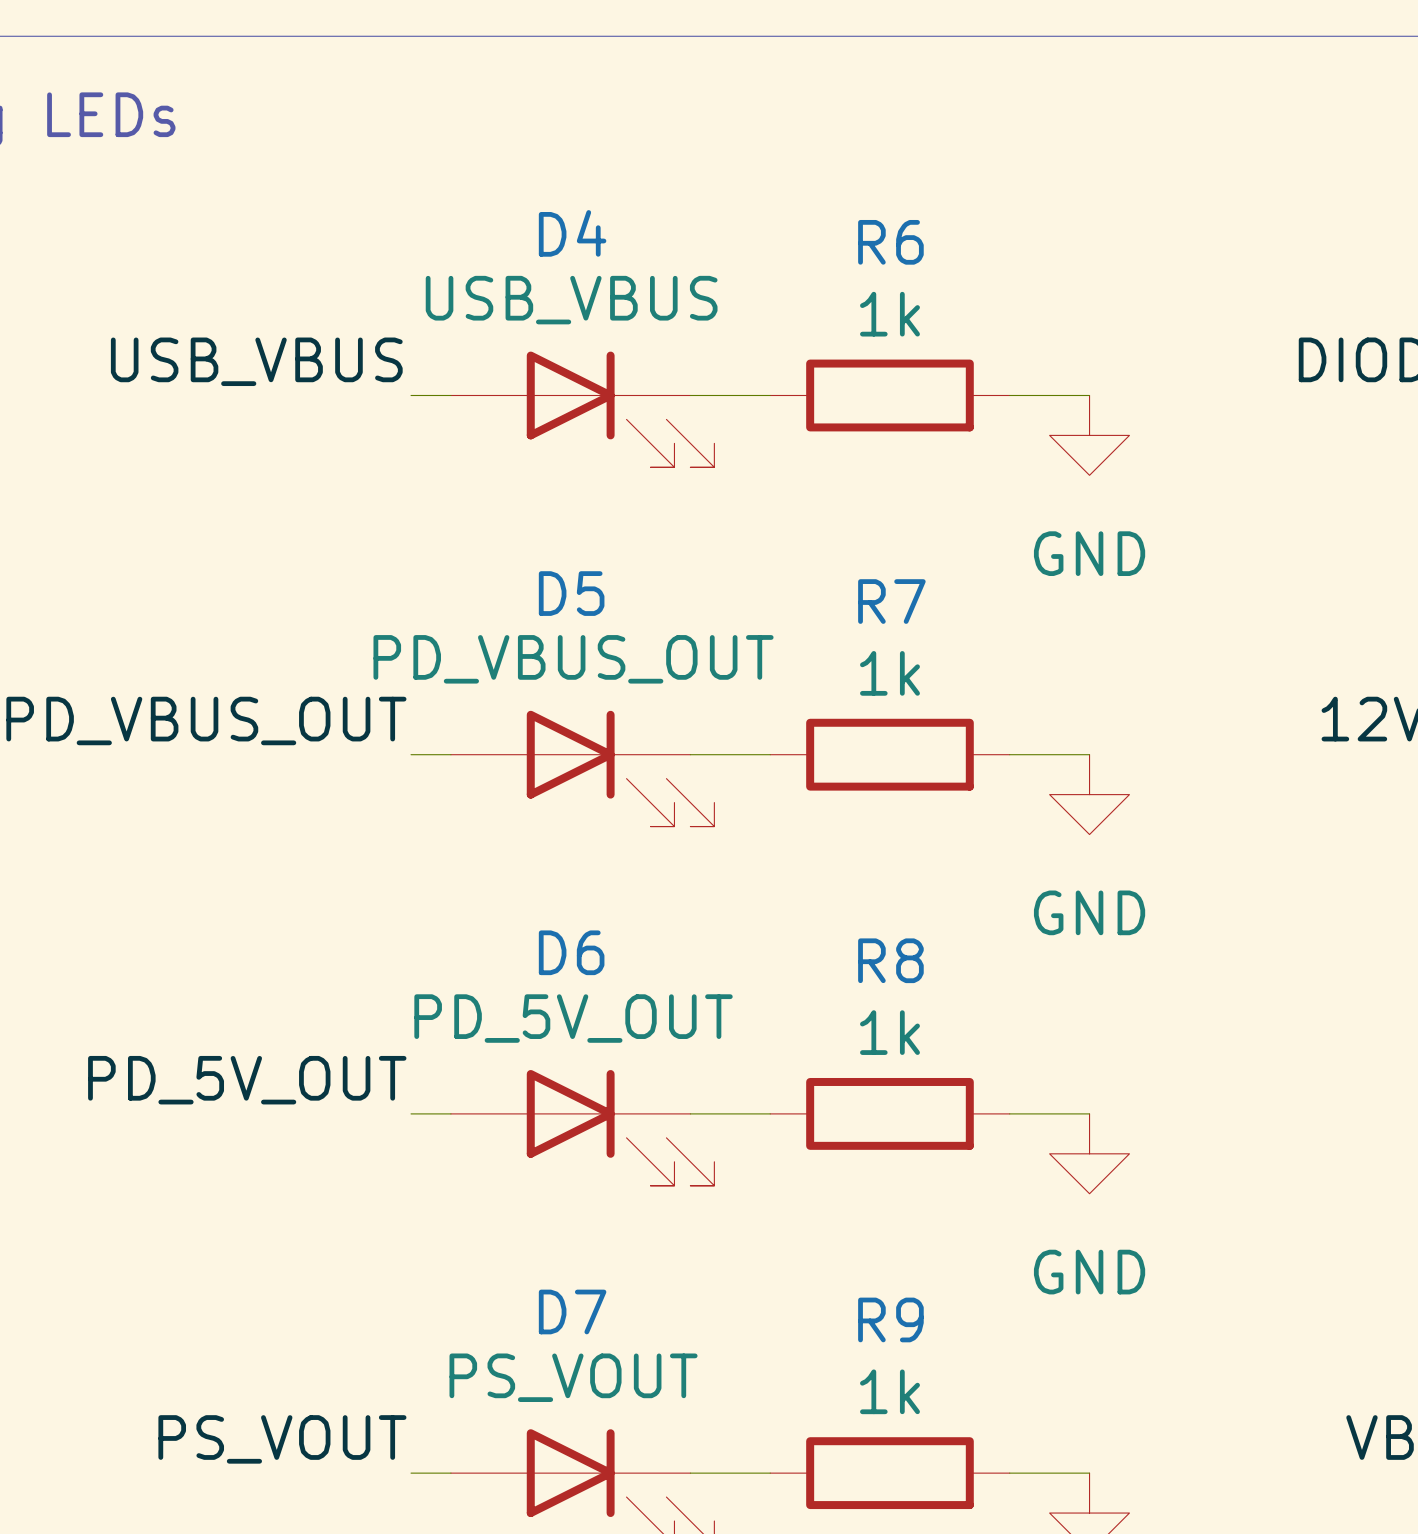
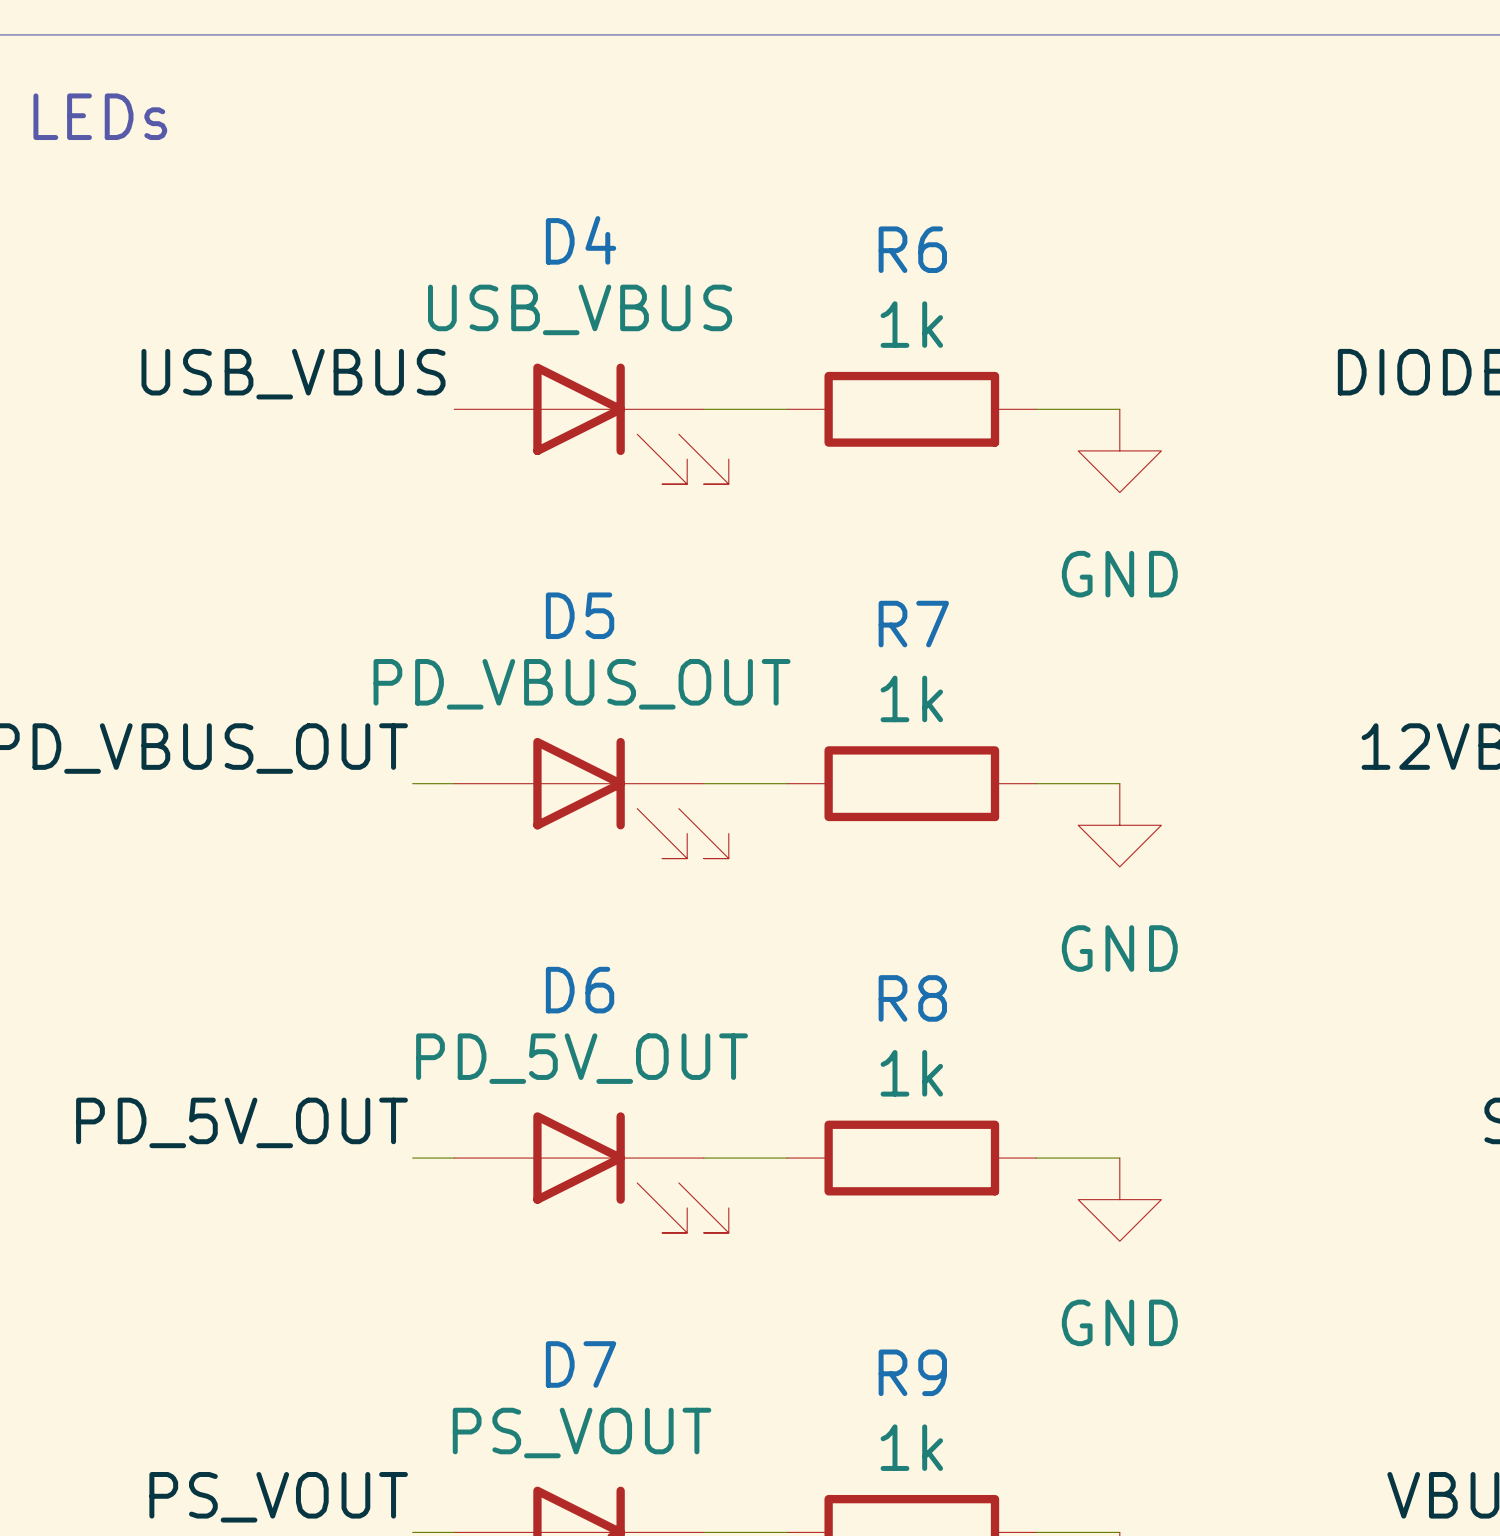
label position: USB_VBUS (256, 361) -> USB_VBUS (293, 374)
wire: (411, 395) (450, 395) -> none

